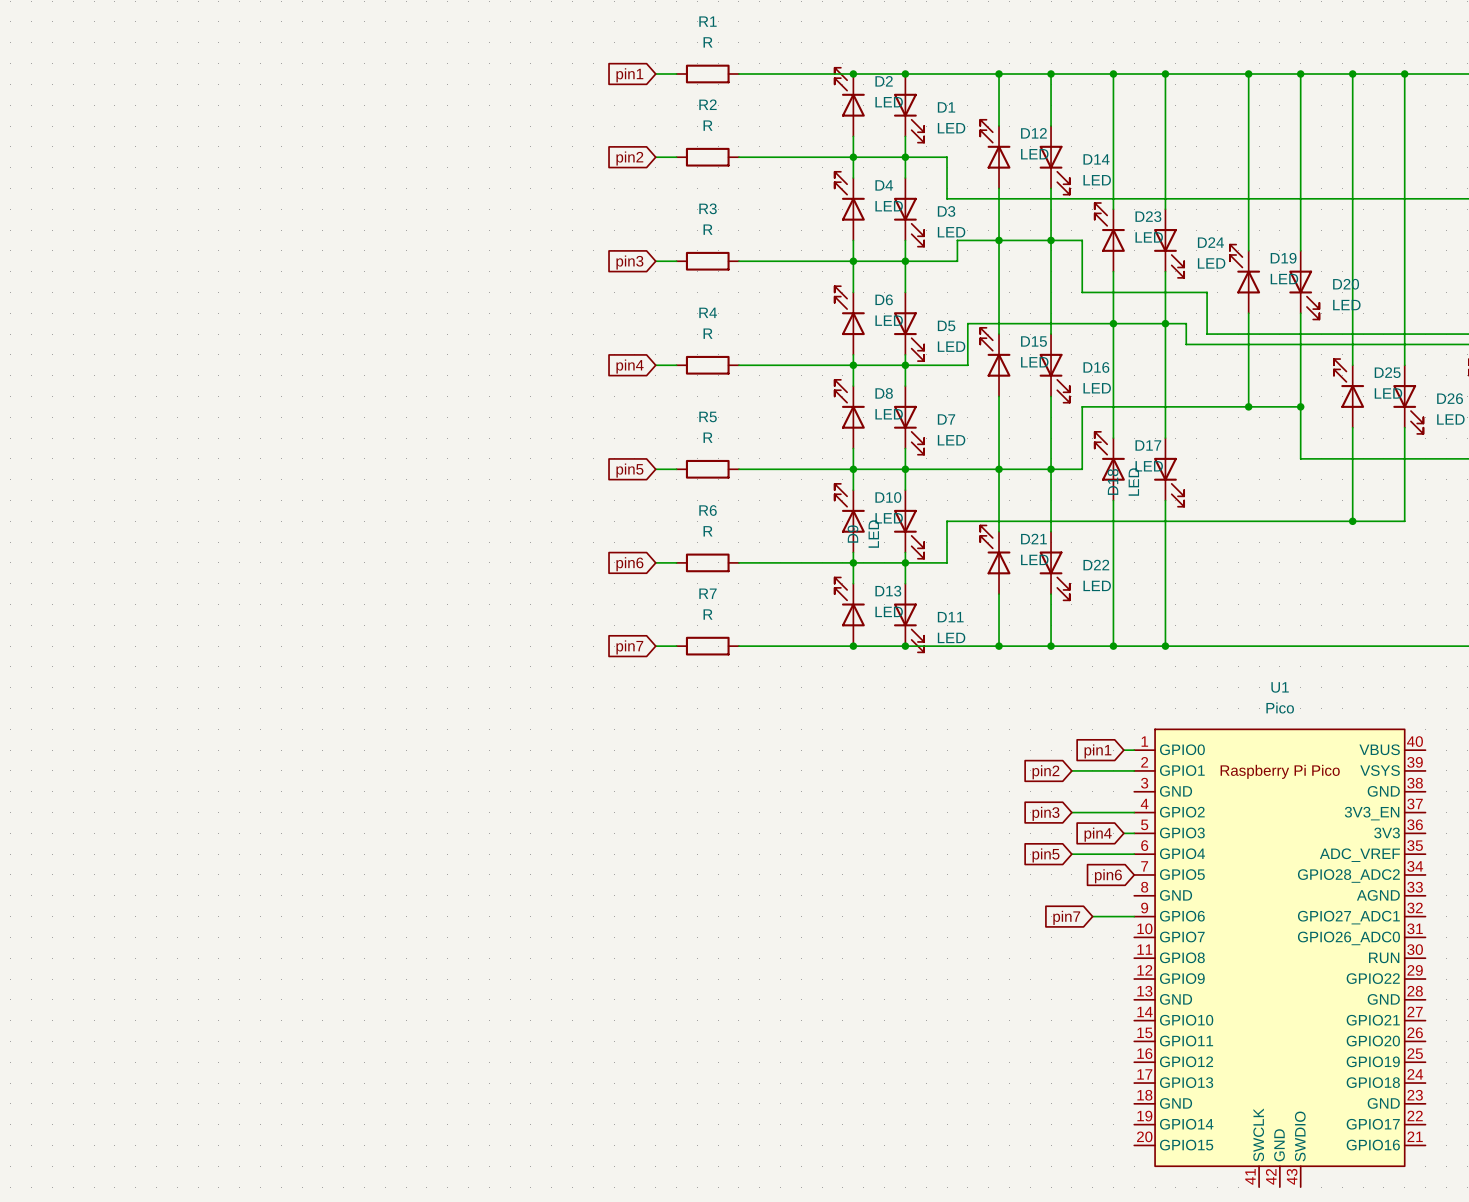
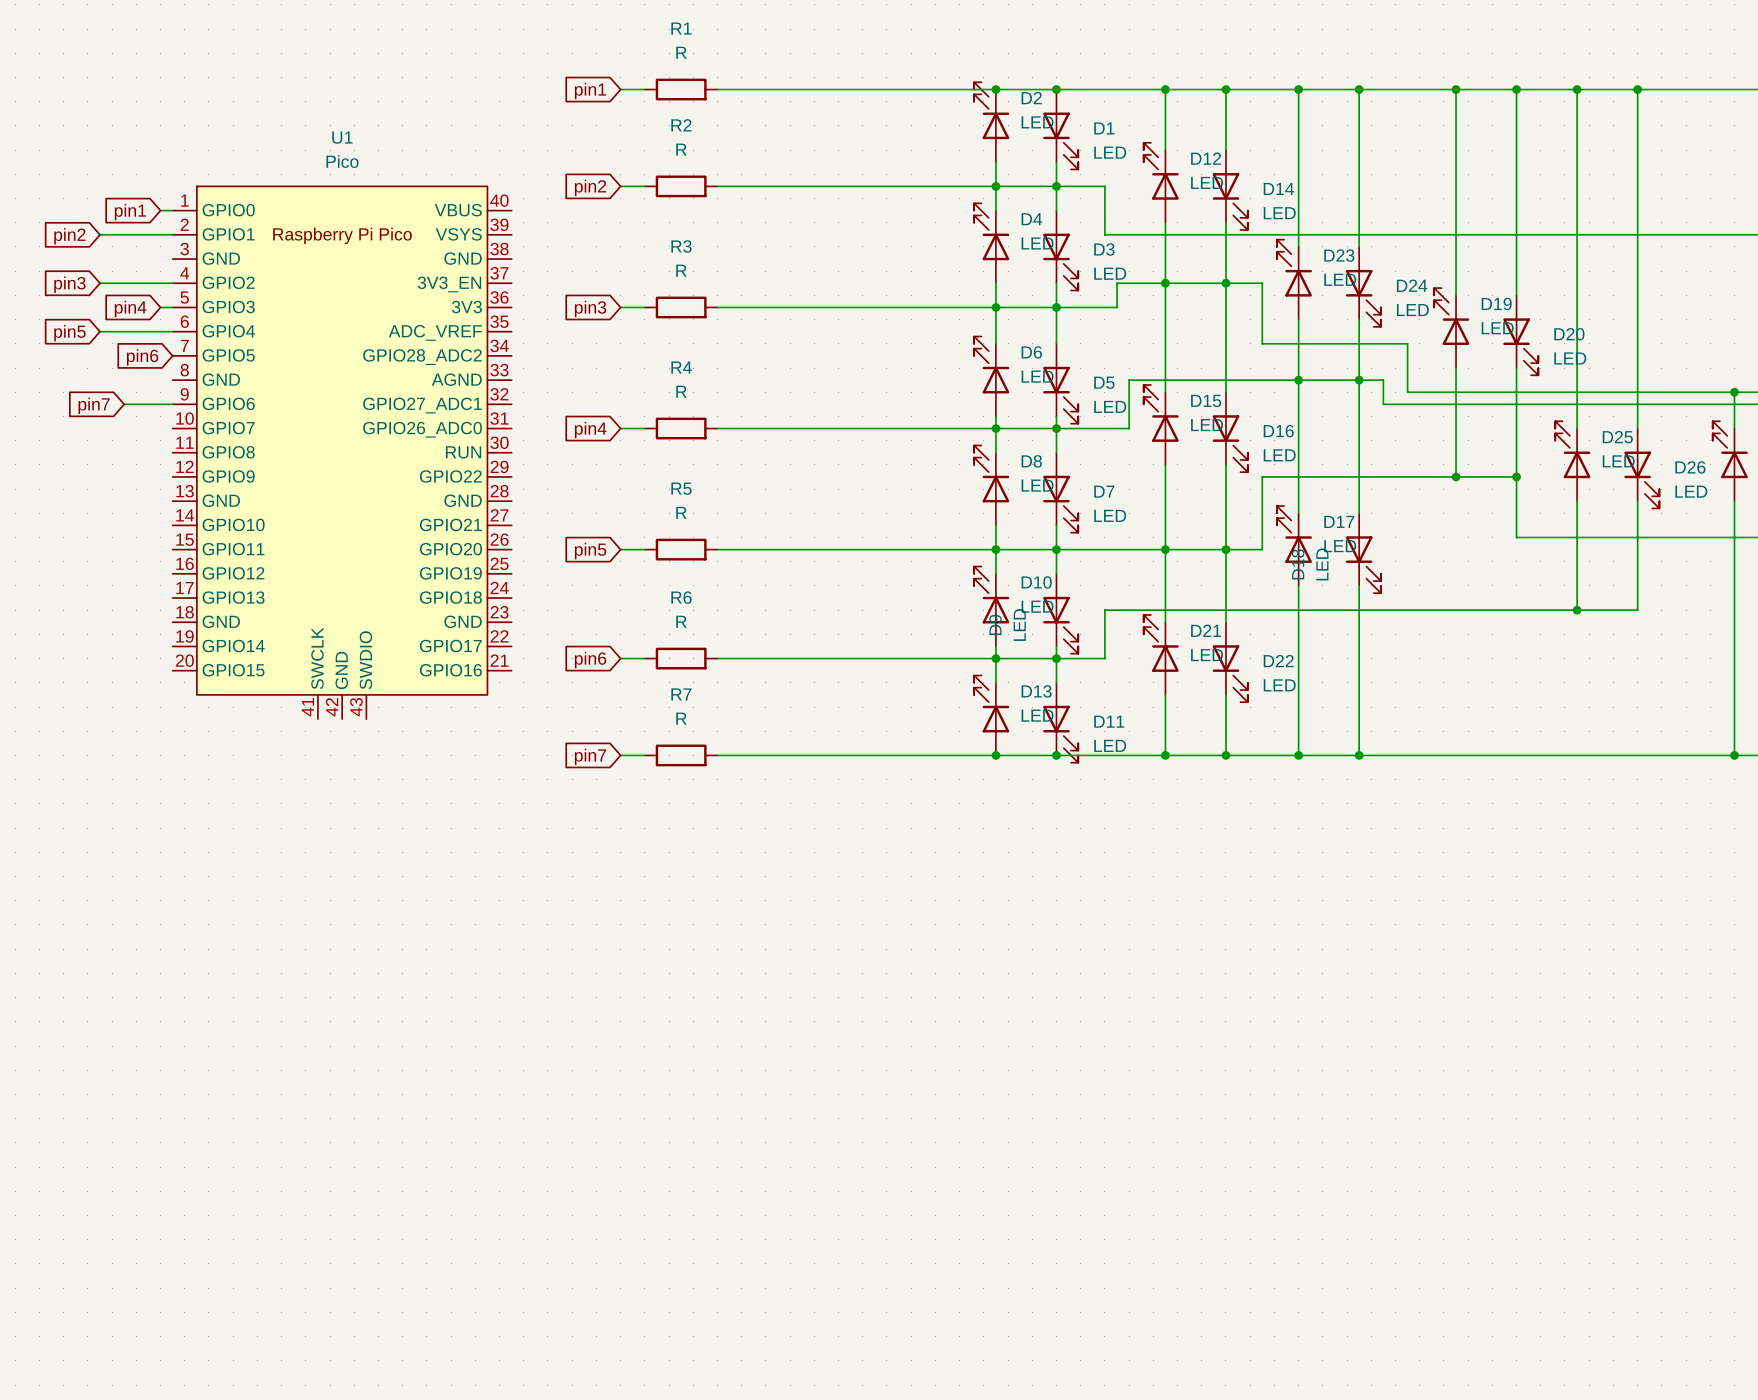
wire: none -> (620, 89) (644, 89)
wire: none -> (717, 89) (765, 89)
wire: none -> (790, 89) (862, 89)
R1 position: (707, 74) -> (681, 89)
global label position: pin1 (629, 75) -> pin1 (590, 91)
wire: none -> (620, 186) (644, 186)
wire: none -> (717, 186) (765, 186)
wire: none -> (790, 186) (862, 186)
R2 position: (707, 157) -> (681, 186)
global label position: pin2 (629, 158) -> pin2 (590, 187)
wire: none -> (160, 210) (172, 210)
global label: none -> pin1 (130, 212)
wire: none -> (100, 234) (172, 234)
global label: none -> pin2 (69, 236)
wire: none -> (100, 283) (172, 283)
global label: none -> pin3 (69, 284)
wire: none -> (160, 307) (172, 307)
wire: none -> (620, 307) (644, 307)
wire: none -> (717, 307) (765, 307)
wire: none -> (790, 307) (862, 307)
R3 position: (707, 261) -> (681, 307)
global label: none -> pin4 (130, 308)
global label position: pin3 (629, 262) -> pin3 (590, 308)
wire: none -> (100, 331) (172, 331)
global label: none -> pin5 (69, 333)
global label: none -> pin6 (142, 357)
wire: none -> (124, 404) (172, 404)
global label: none -> pin7 (94, 405)
wire: none -> (620, 428) (644, 428)
wire: none -> (717, 428) (765, 428)
wire: none -> (790, 428) (862, 428)
R4 position: (707, 365) -> (681, 428)
global label position: pin4 (630, 366) -> pin4 (590, 430)
wire: none -> (620, 549) (644, 549)
wire: none -> (717, 549) (765, 549)
wire: none -> (790, 549) (862, 549)
R5 position: (707, 469) -> (681, 549)
global label position: pin5 (629, 470) -> pin5 (590, 551)
wire: none -> (620, 658) (644, 658)
wire: none -> (717, 658) (765, 658)
wire: none -> (790, 658) (862, 658)
R6 position: (707, 562) -> (681, 658)
global label position: pin6 (629, 564) -> pin6 (590, 660)
wire: none -> (620, 755) (644, 755)
wire: none -> (717, 755) (765, 755)
wire: none -> (790, 755) (862, 755)
R7 position: (707, 646) -> (681, 755)
global label position: pin7 (629, 647) -> pin7 (590, 756)
wire: (1123, 750) (1134, 750) -> none
global label: pin1 (1097, 751) -> none
wire: (1071, 770) (1134, 770) -> none
global label: pin2 (1045, 772) -> none
wire: (1071, 812) (1134, 812) -> none
global label: pin3 (1045, 813) -> none
wire: (1123, 833) (1134, 833) -> none
global label: pin4 (1098, 834) -> none
wire: (1071, 854) (1134, 854) -> none
global label: pin5 (1046, 855) -> none
global label: pin6 (1108, 876) -> none
wire: (1092, 916) (1134, 916) -> none
global label: pin7 (1066, 917) -> none
U1 position: (1279, 958) -> (342, 452)

